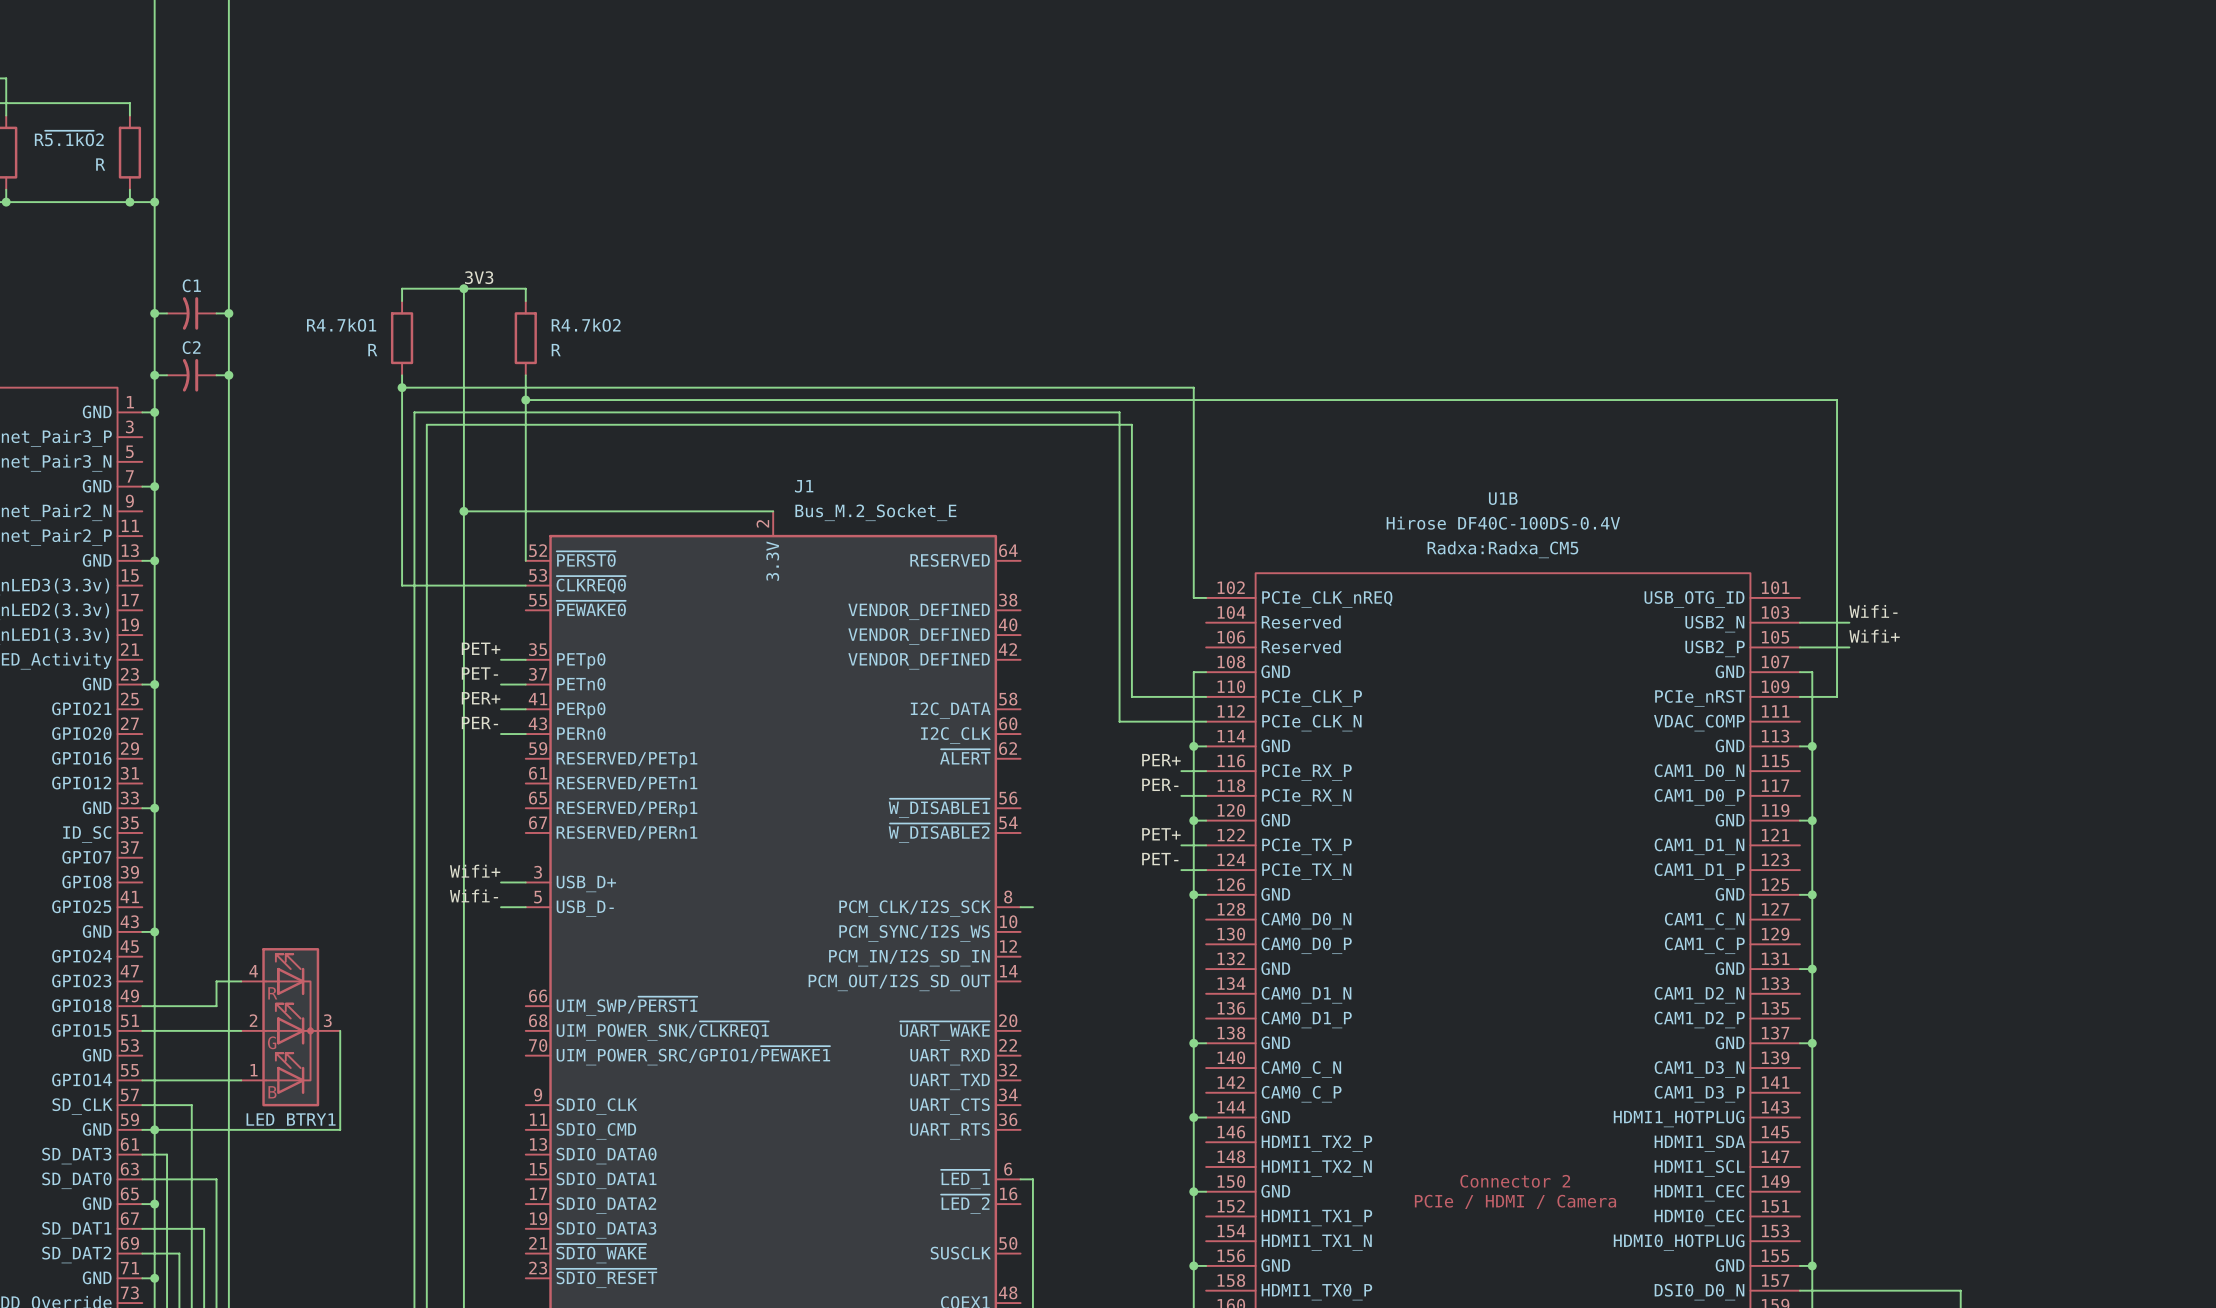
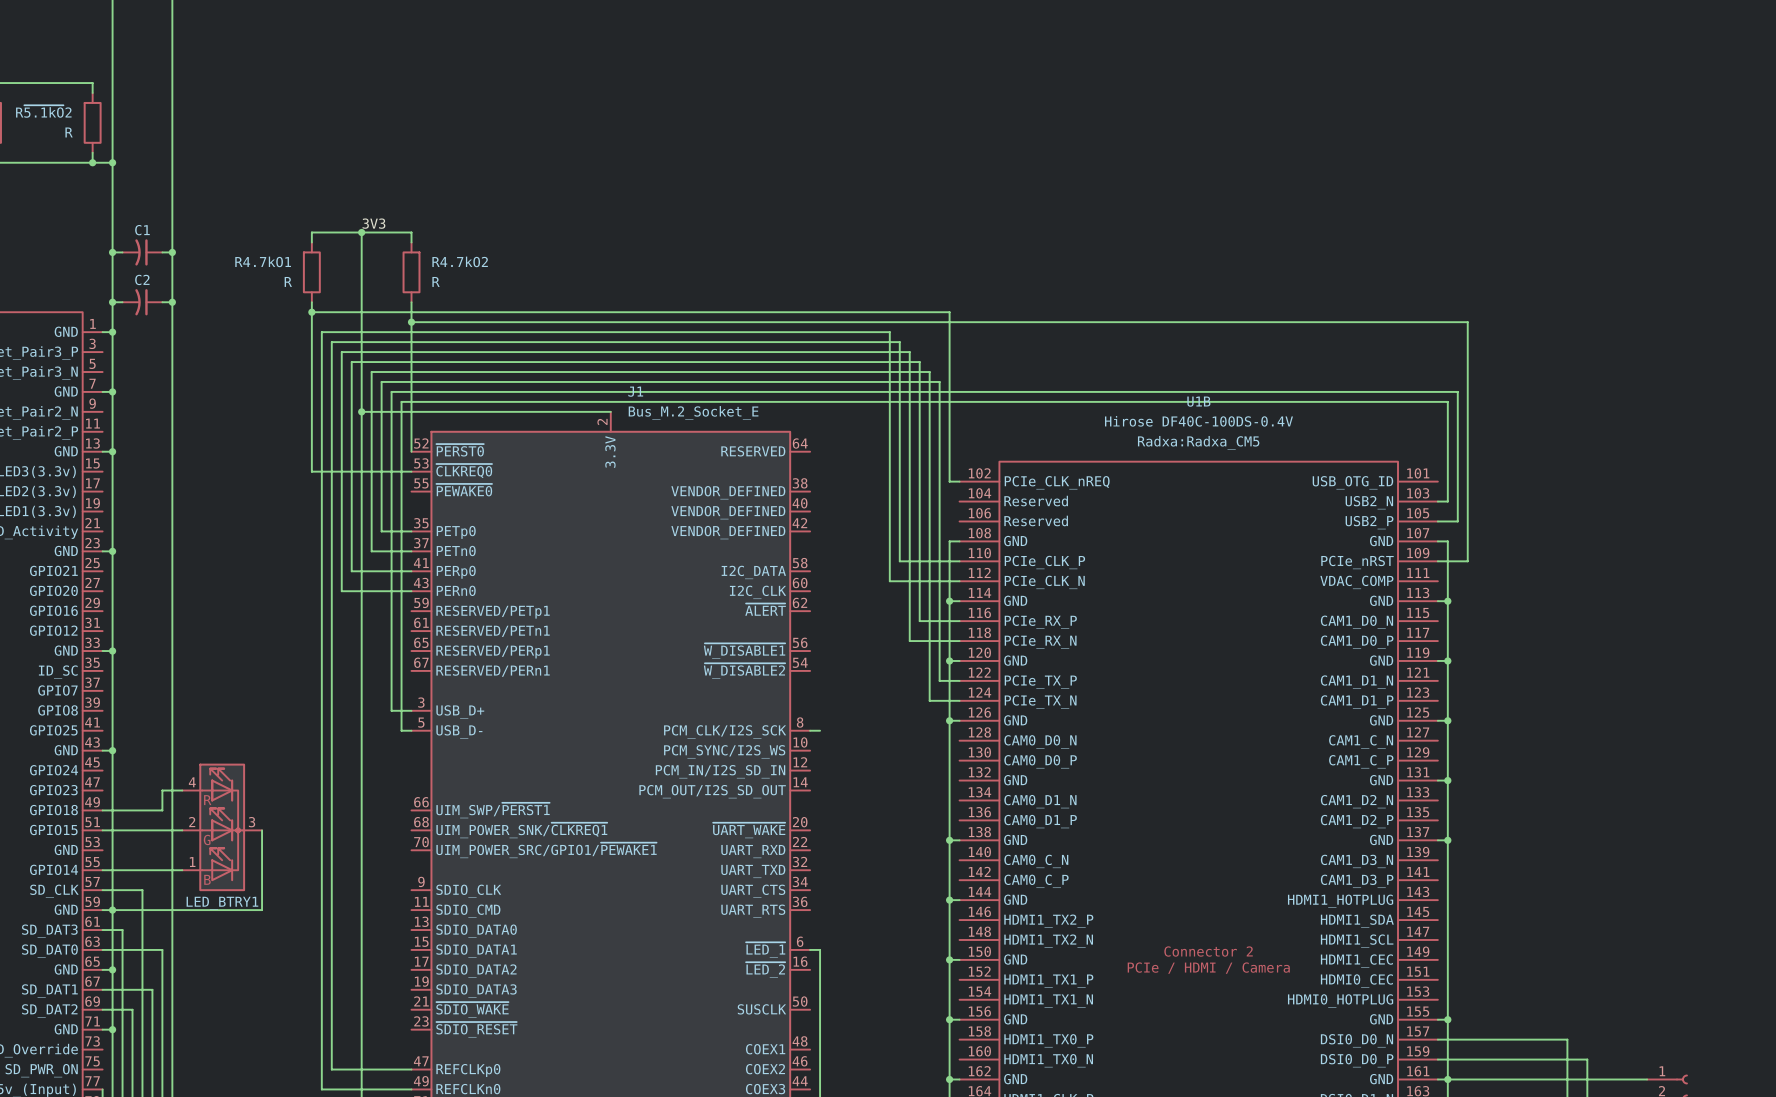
label: Wifi- (1873, 611) -> none
wire: (1812, 622) (1849, 622) -> none
label: Wifi+ (1874, 636) -> none
wire: (1824, 647) (1849, 647) -> (1457, 521) (1457, 391) (391, 391) (391, 710)
label: PET+ (481, 648) -> none
wire: none -> (391, 531) (381, 531) (381, 381) (939, 381) (939, 680)
label: PET- (479, 673) -> none
wire: none -> (391, 551) (371, 551) (371, 372) (929, 372) (929, 700) (939, 700)
label: PER+ (481, 698) -> none
wire: none -> (391, 571) (351, 571) (351, 362) (919, 362) (919, 621) (939, 621)
label: PER- (479, 722) -> none
wire: none -> (391, 591) (341, 591) (341, 352) (909, 352) (909, 641) (939, 641)
label: PER+ (1161, 760) -> none
label: PER- (1160, 784) -> none
label: PET+ (1161, 834) -> none
label: PET- (1160, 859) -> none
label: Wifi+ (475, 871) -> none
label: Wifi- (474, 895) -> none
wire: (501, 907) (513, 907) -> (1447, 501) (1447, 401) (401, 401) (401, 730)

